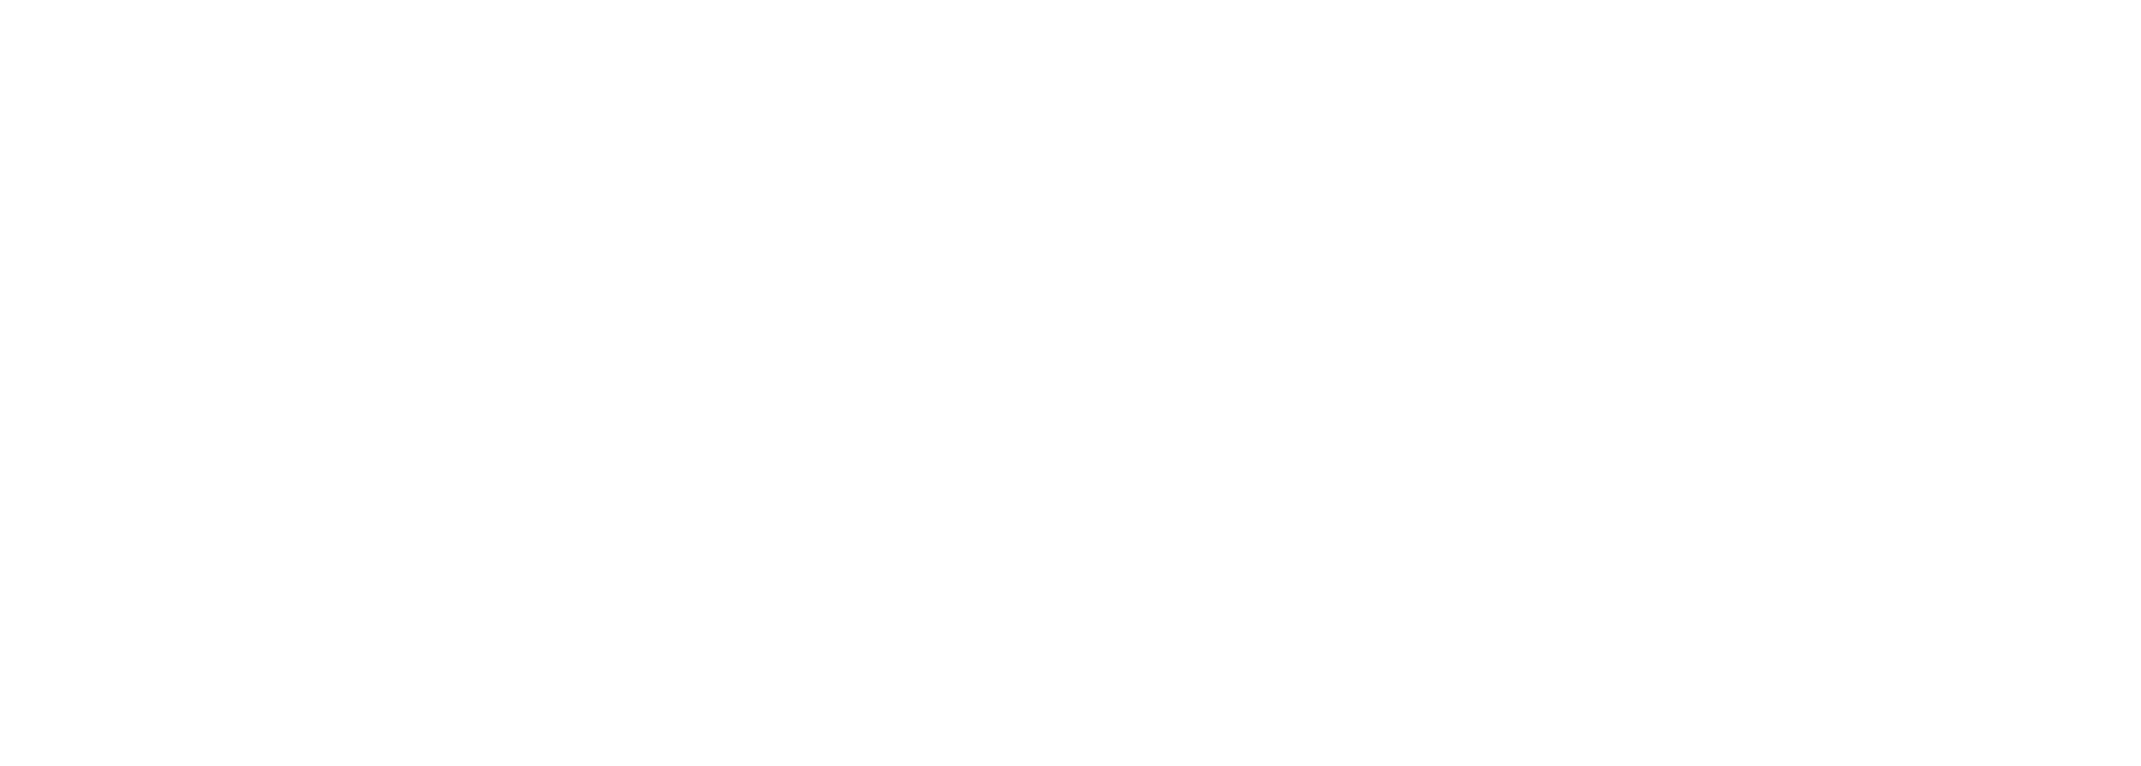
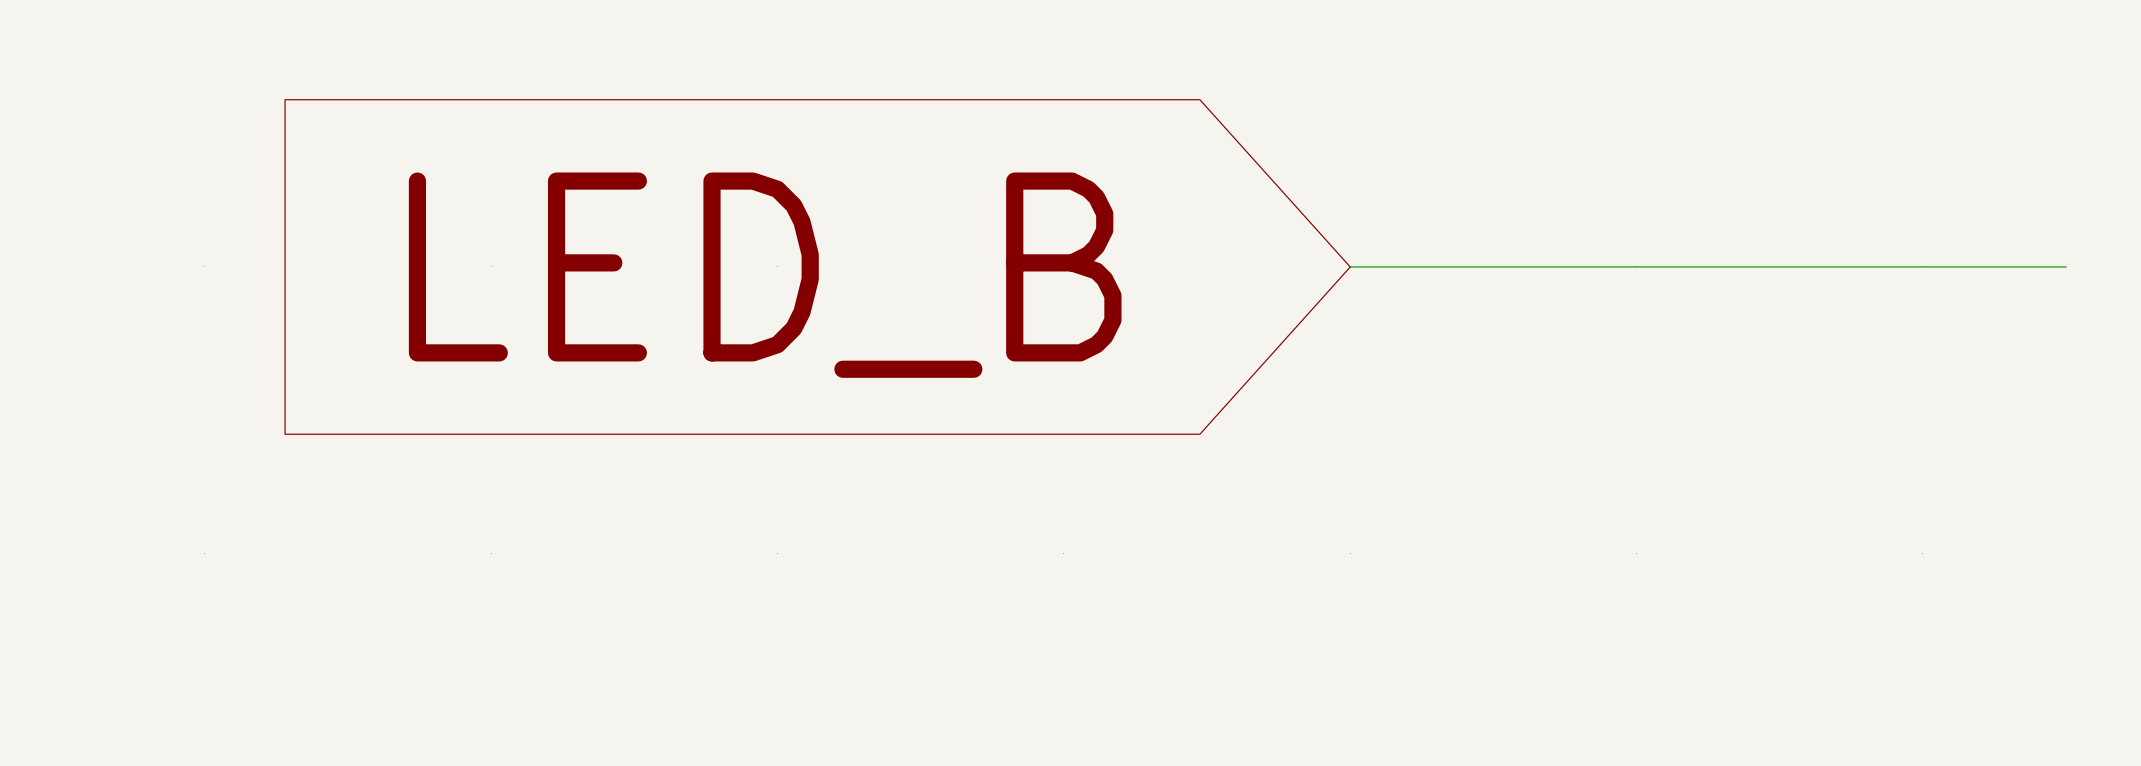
wire: none -> (1350, 266) (2066, 266)
global label: none -> LED_B (765, 275)

